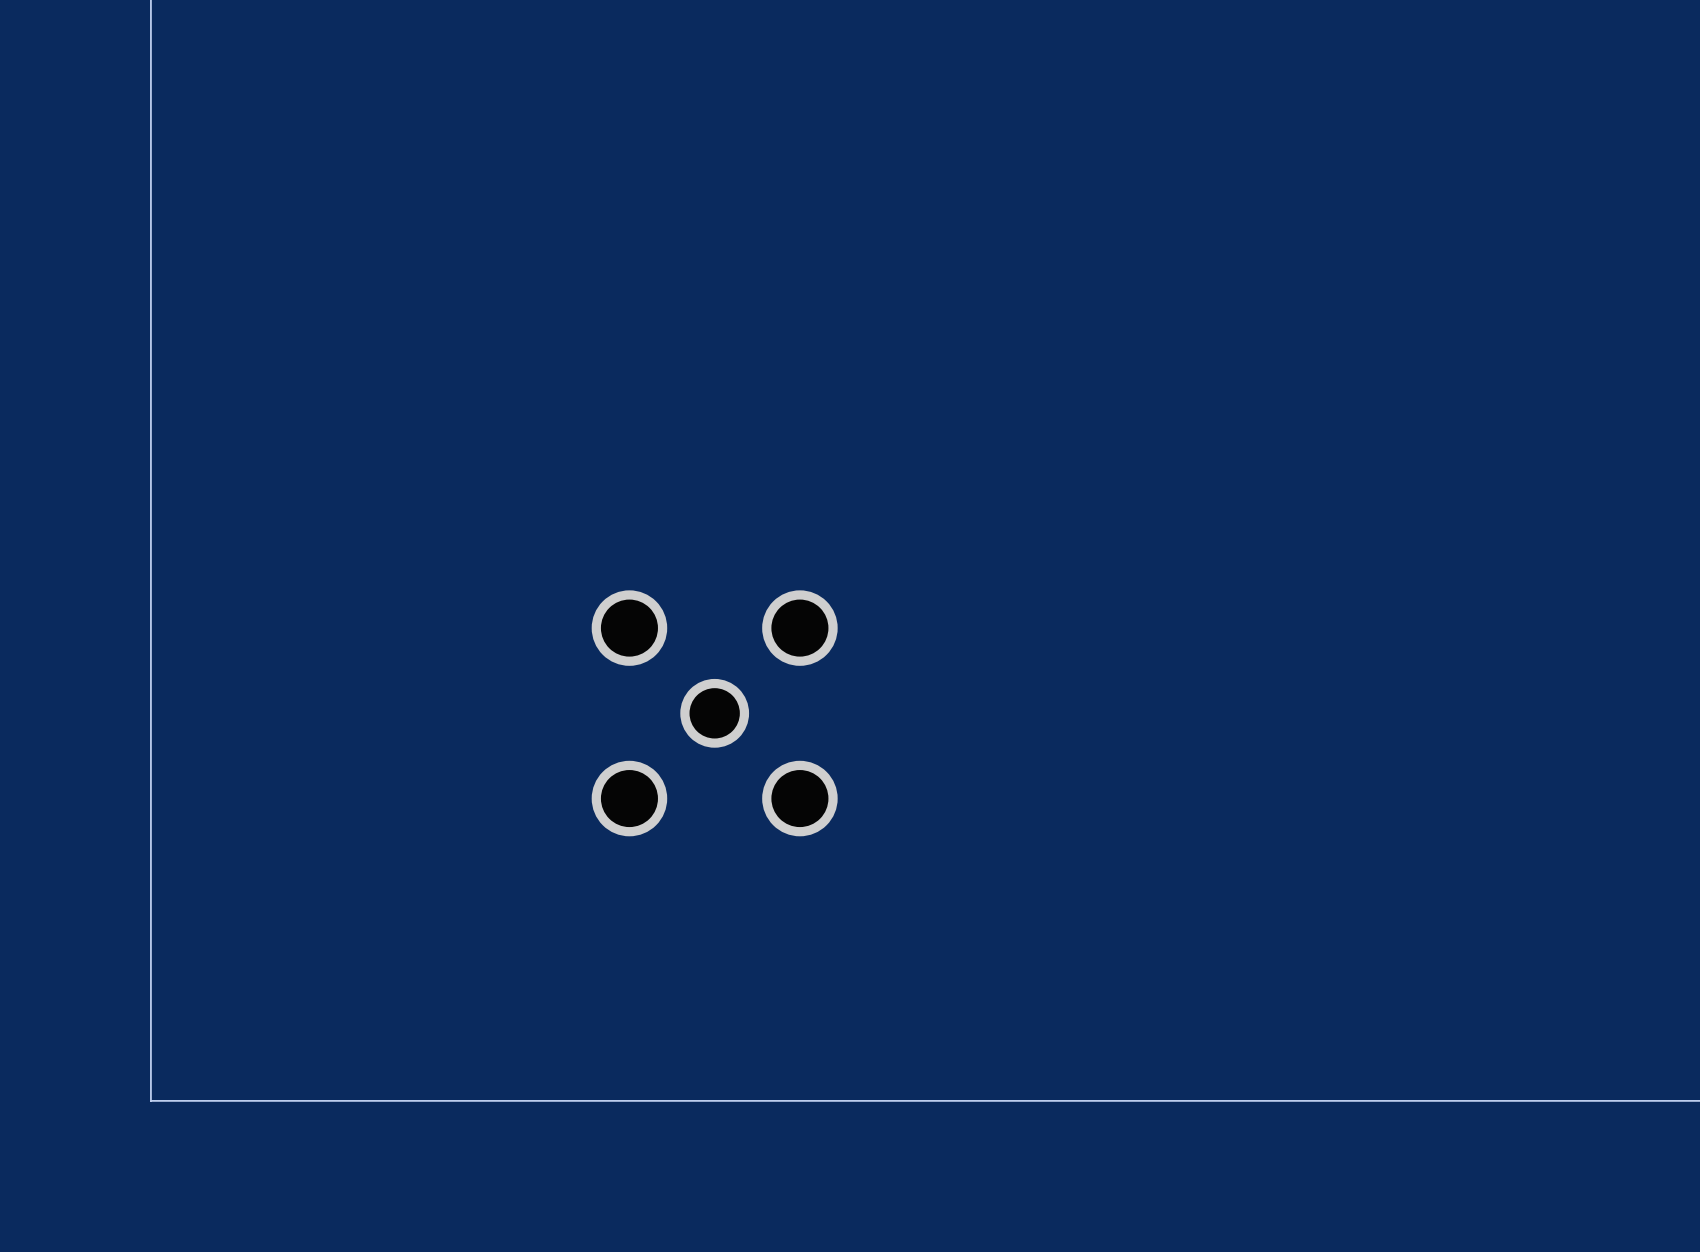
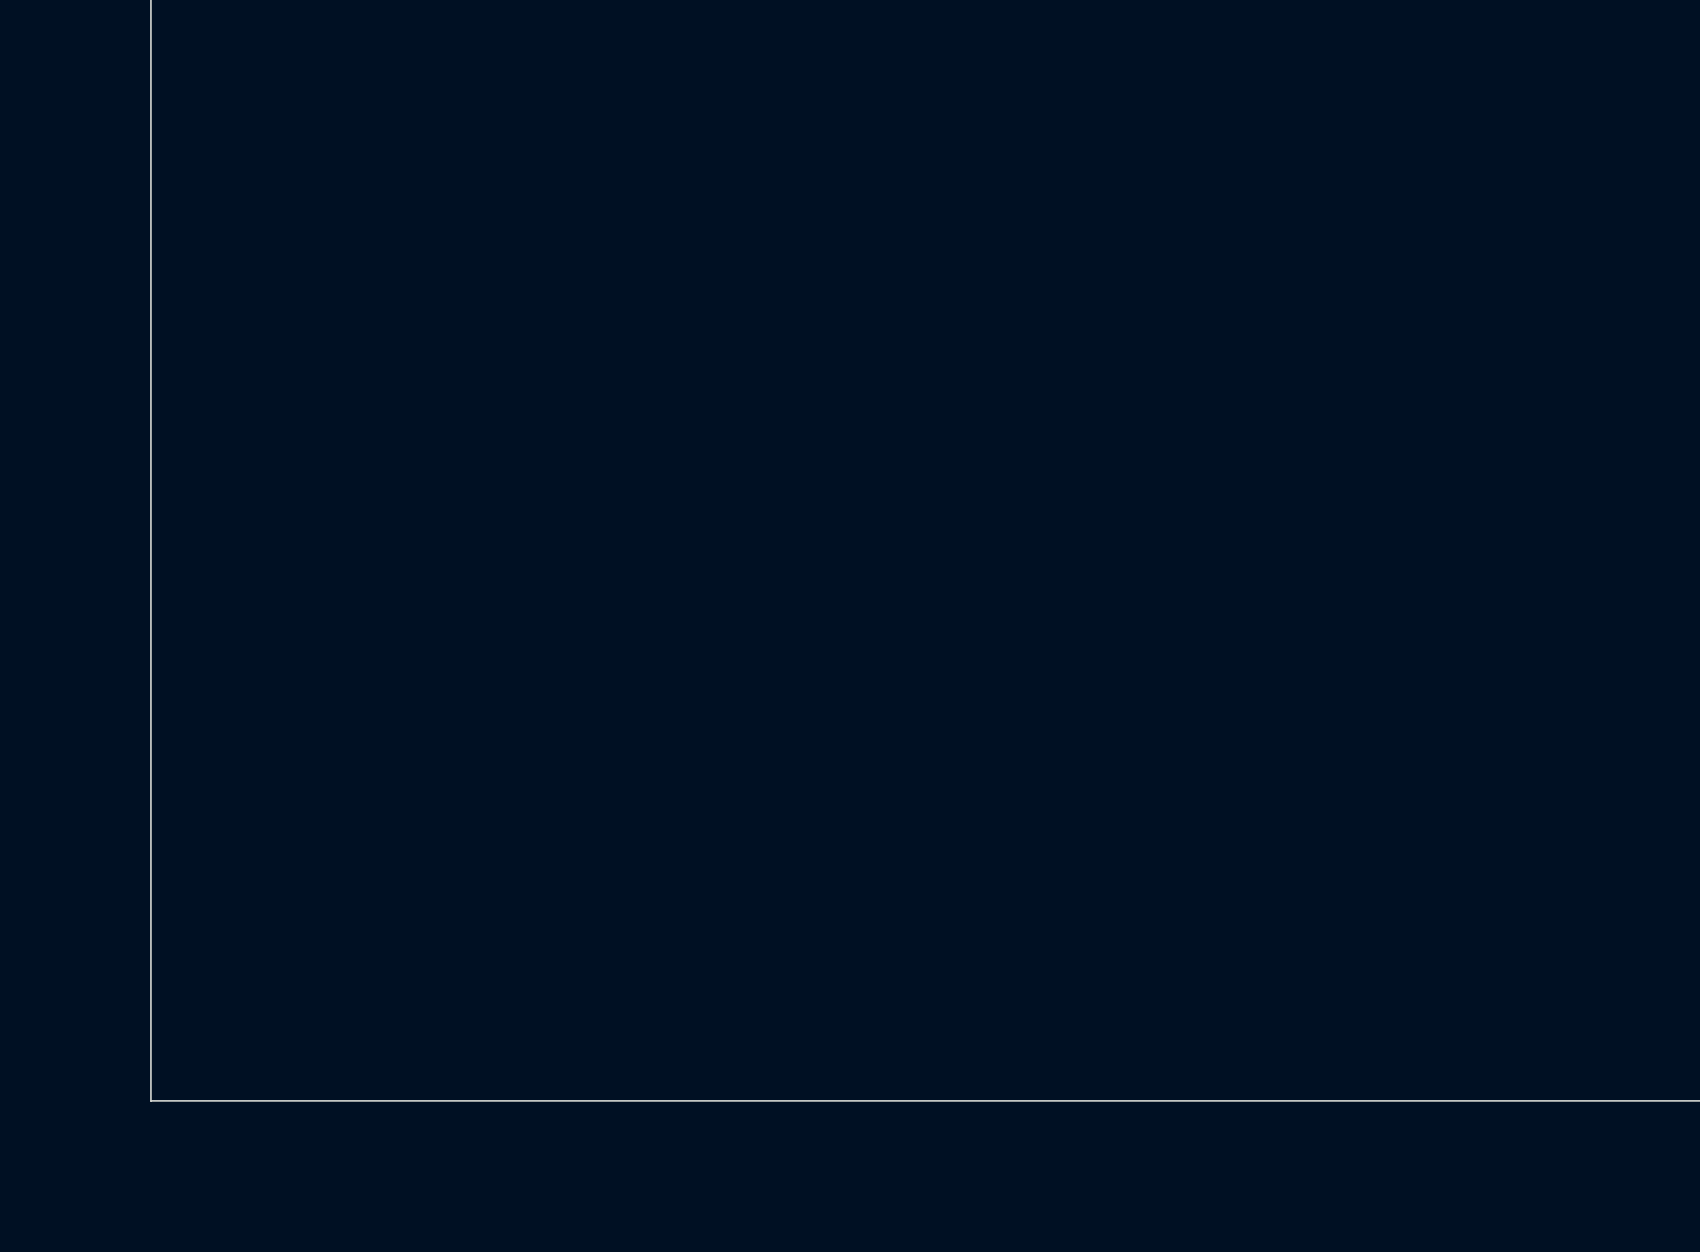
part: (714, 713) -> none

